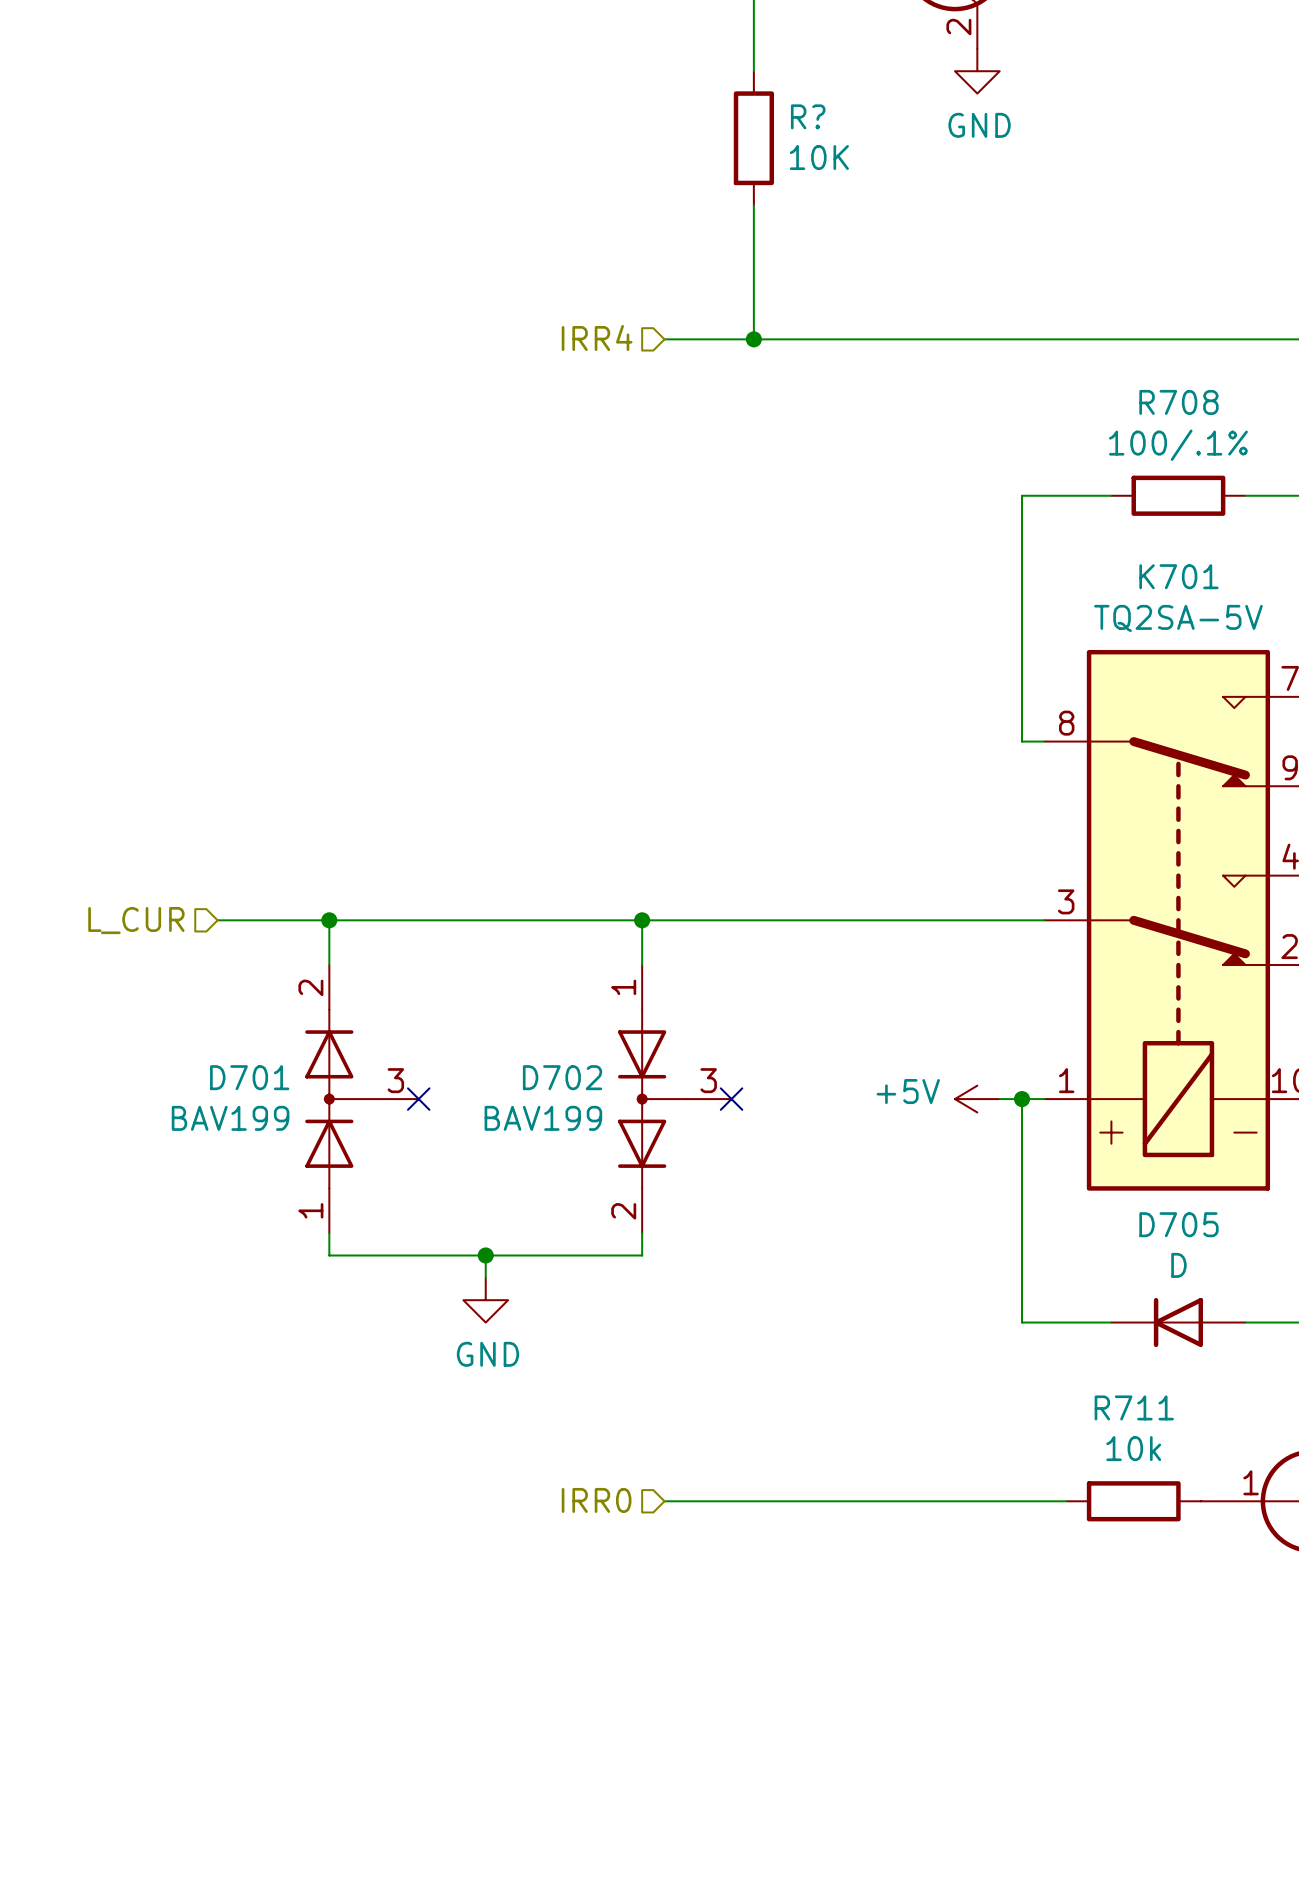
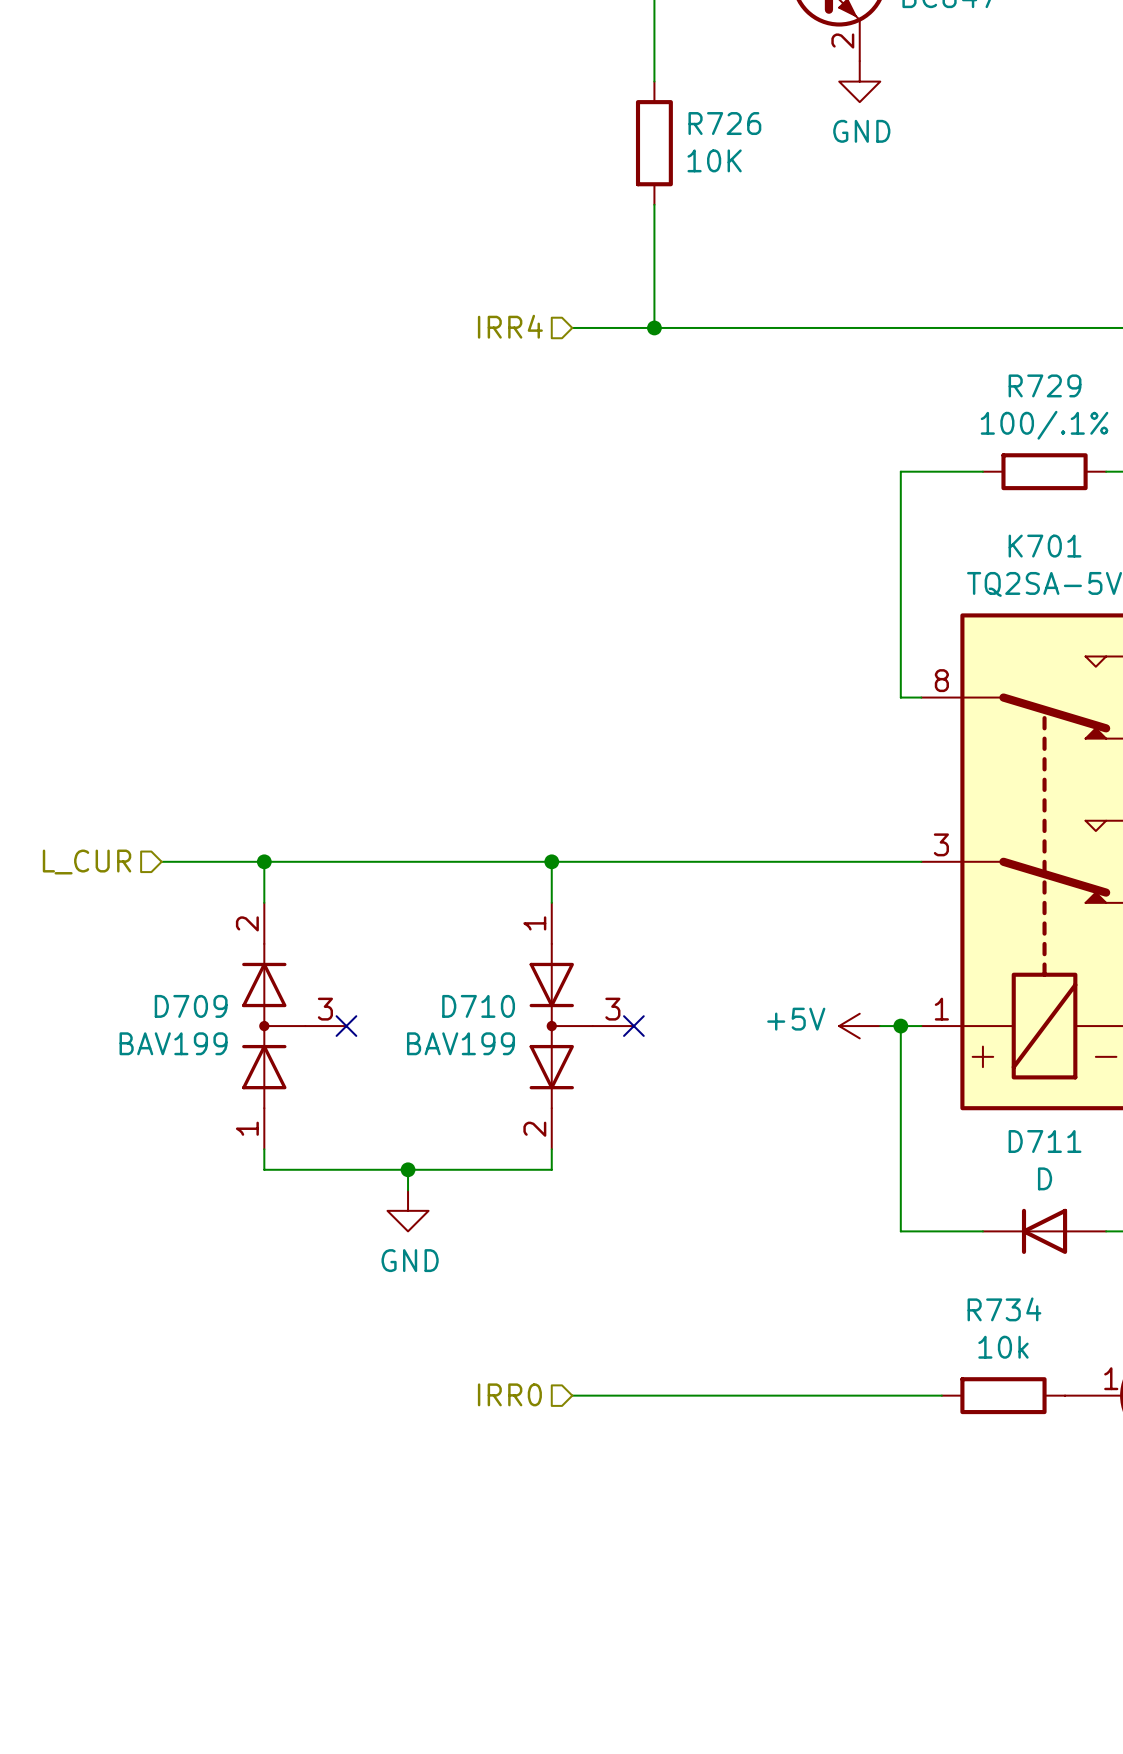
R? name: R? (808, 116) -> R726 (724, 123)
R708 name: R708 (1178, 402) -> R729 (1045, 385)
D701 name: D701 (249, 1077) -> D709 (191, 1006)
D702 name: D702 (562, 1077) -> D710 (478, 1006)
D705 name: D705 (1178, 1224) -> D711 (1045, 1141)
R711 name: R711 (1134, 1407) -> R734 (1004, 1309)

